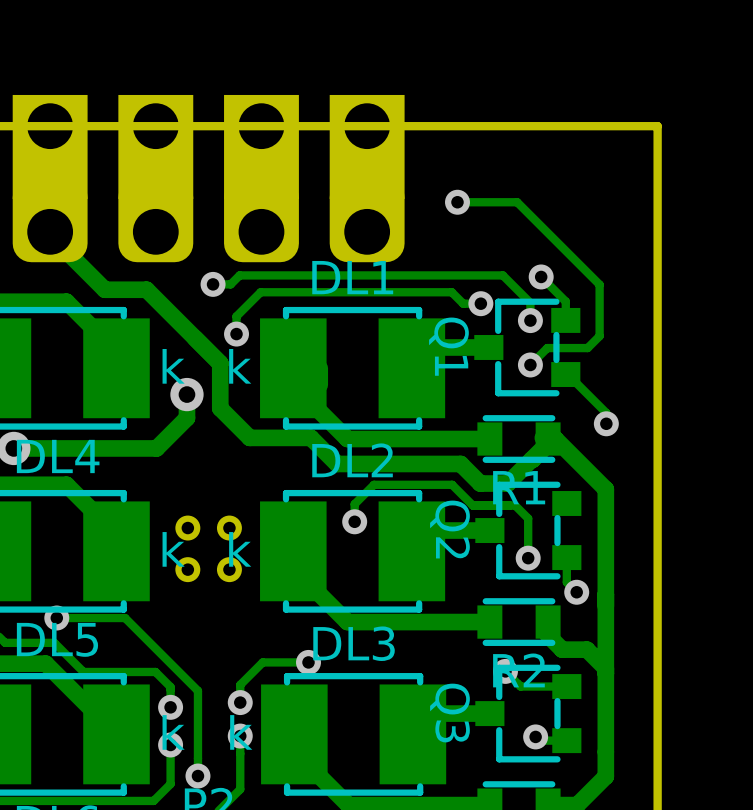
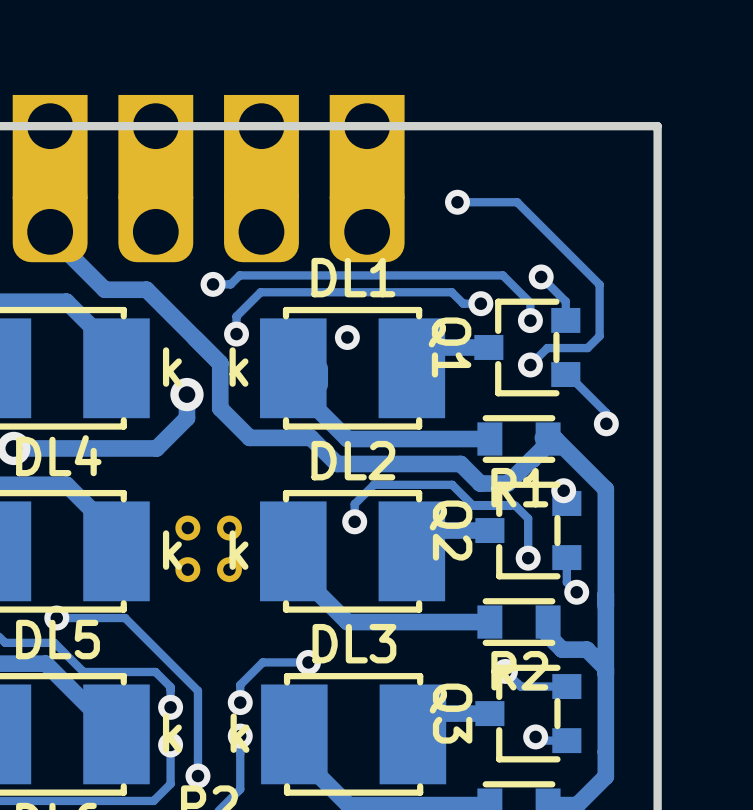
via: none -> (347, 337)
via: none -> (563, 490)

